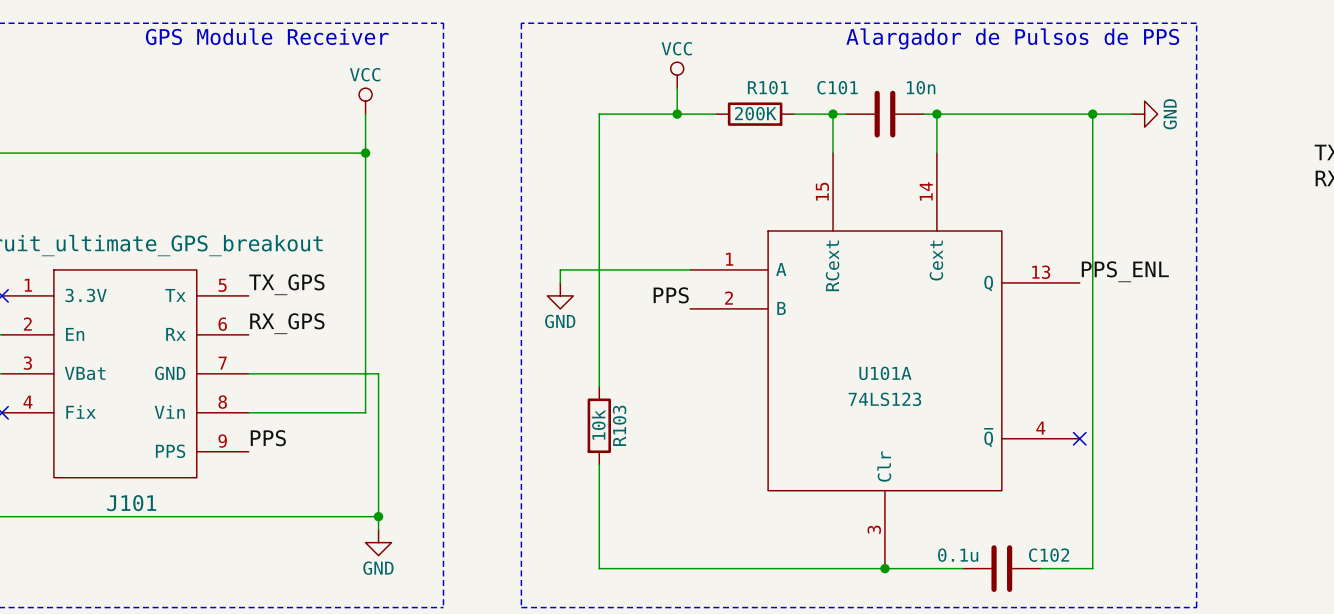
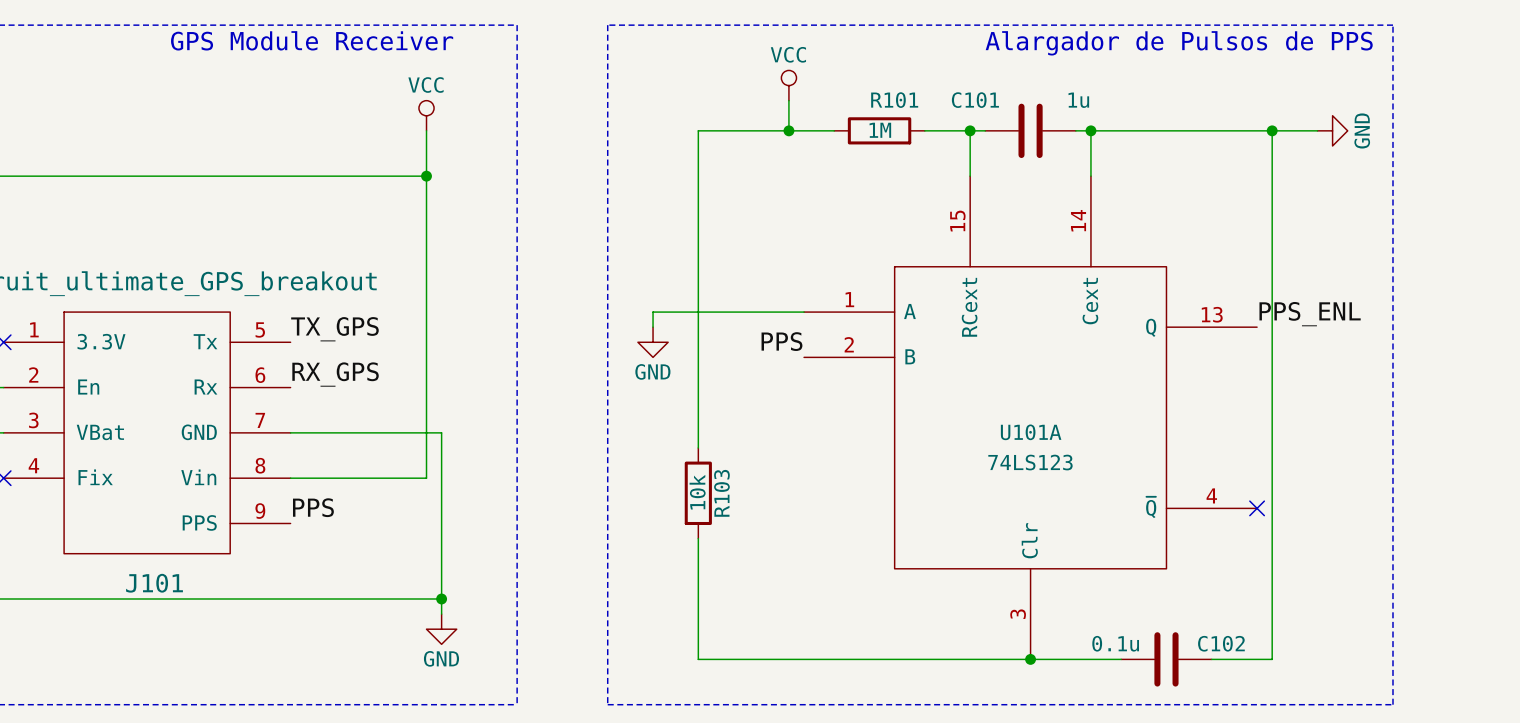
C101 value: 10n (921, 87) -> 1u (1078, 100)
R101 value: 200K (755, 113) -> 1M (880, 130)

